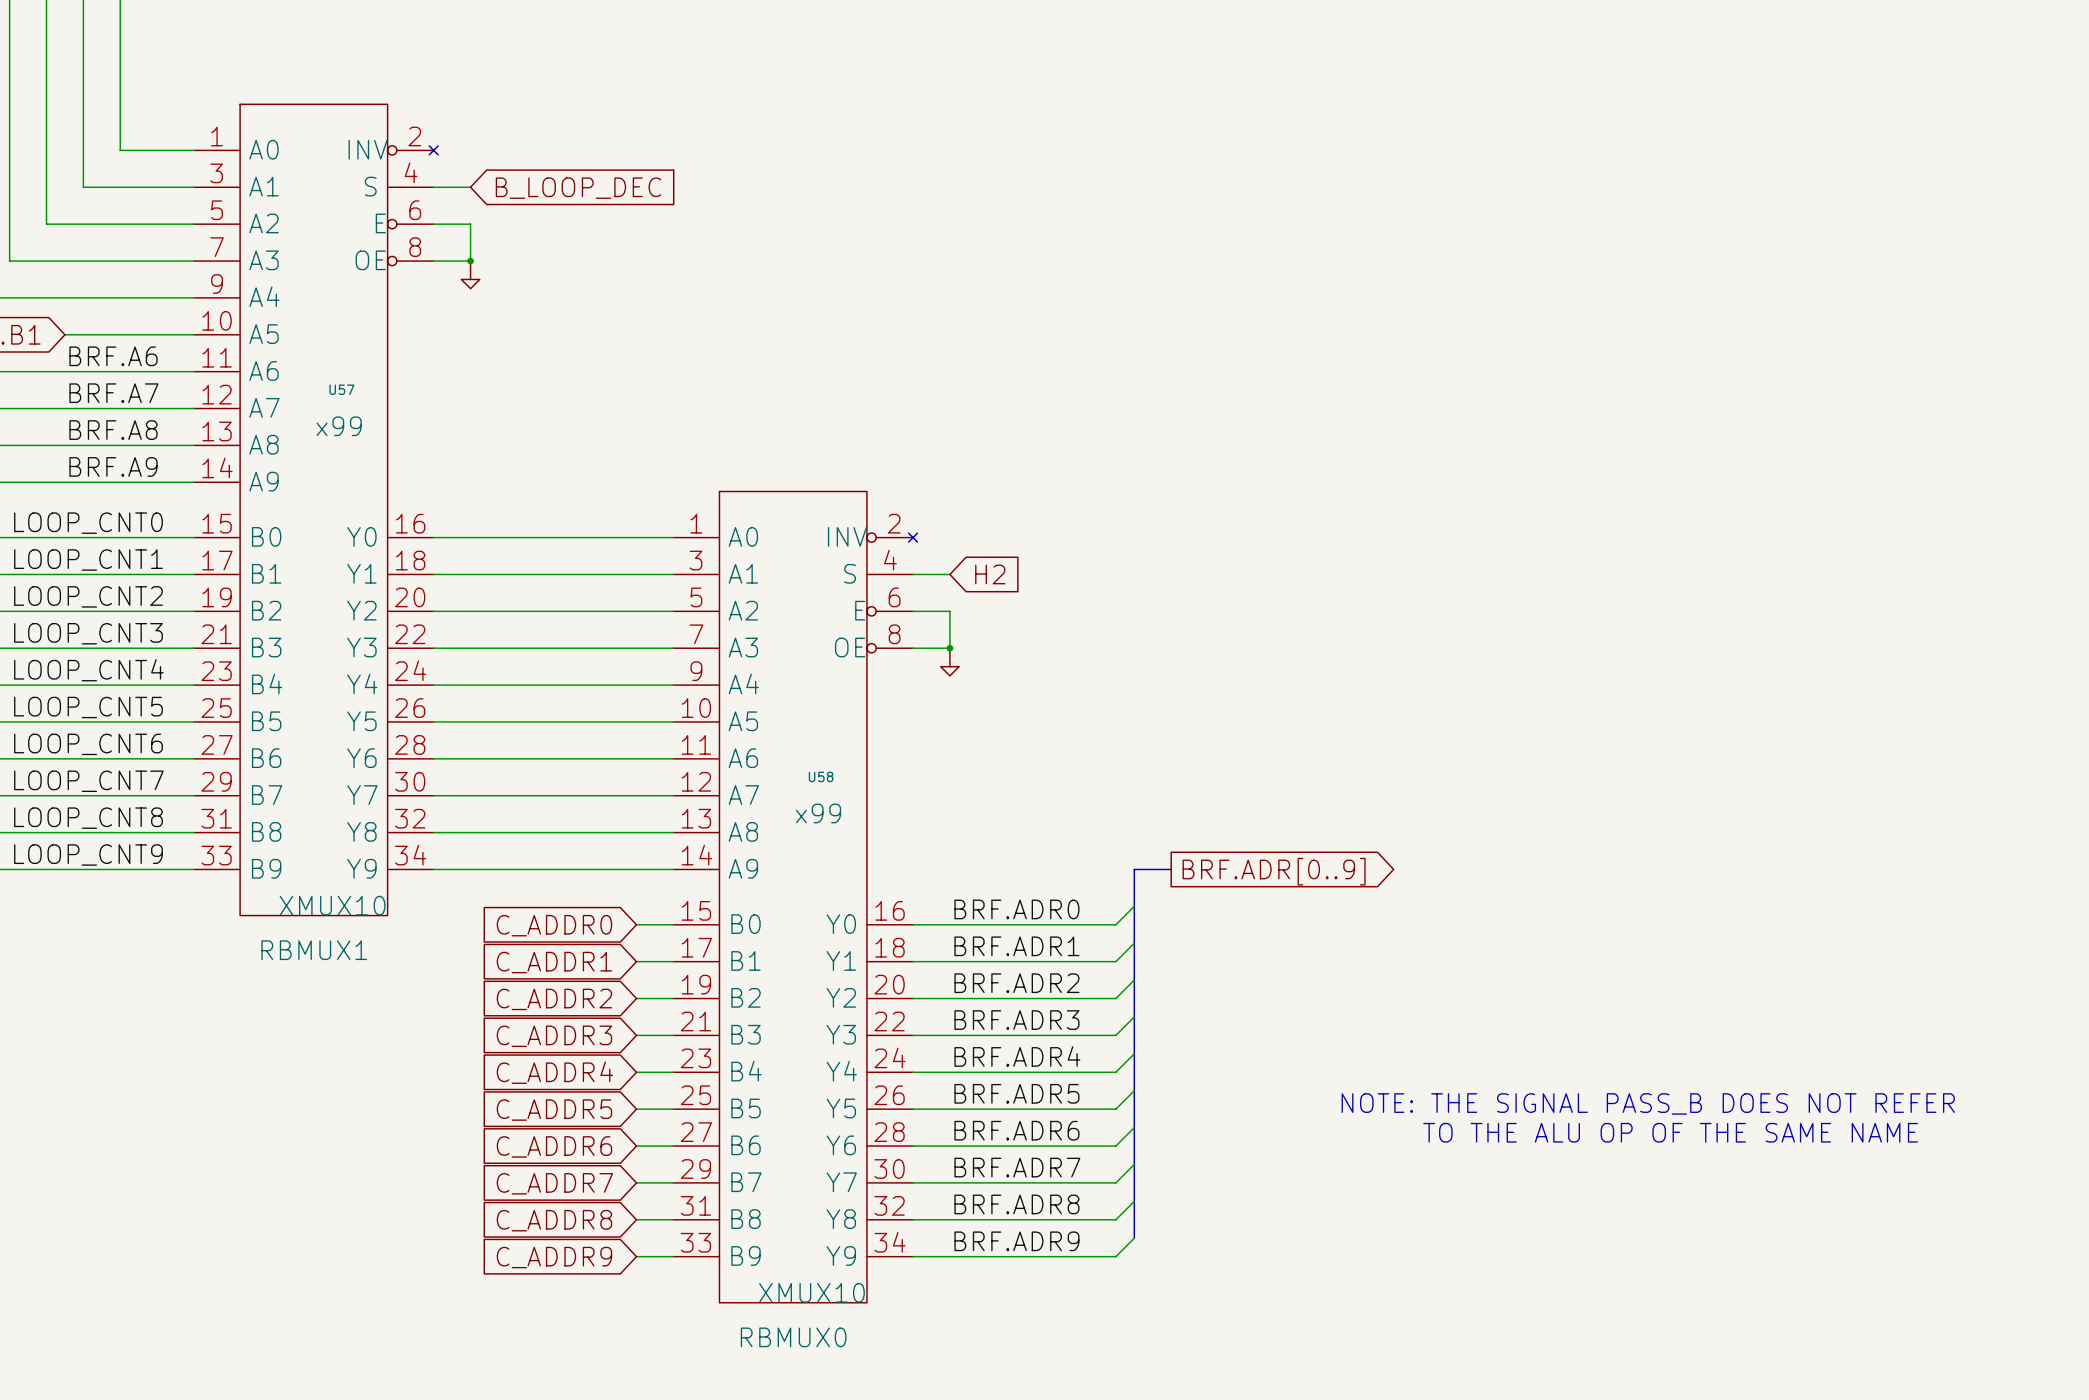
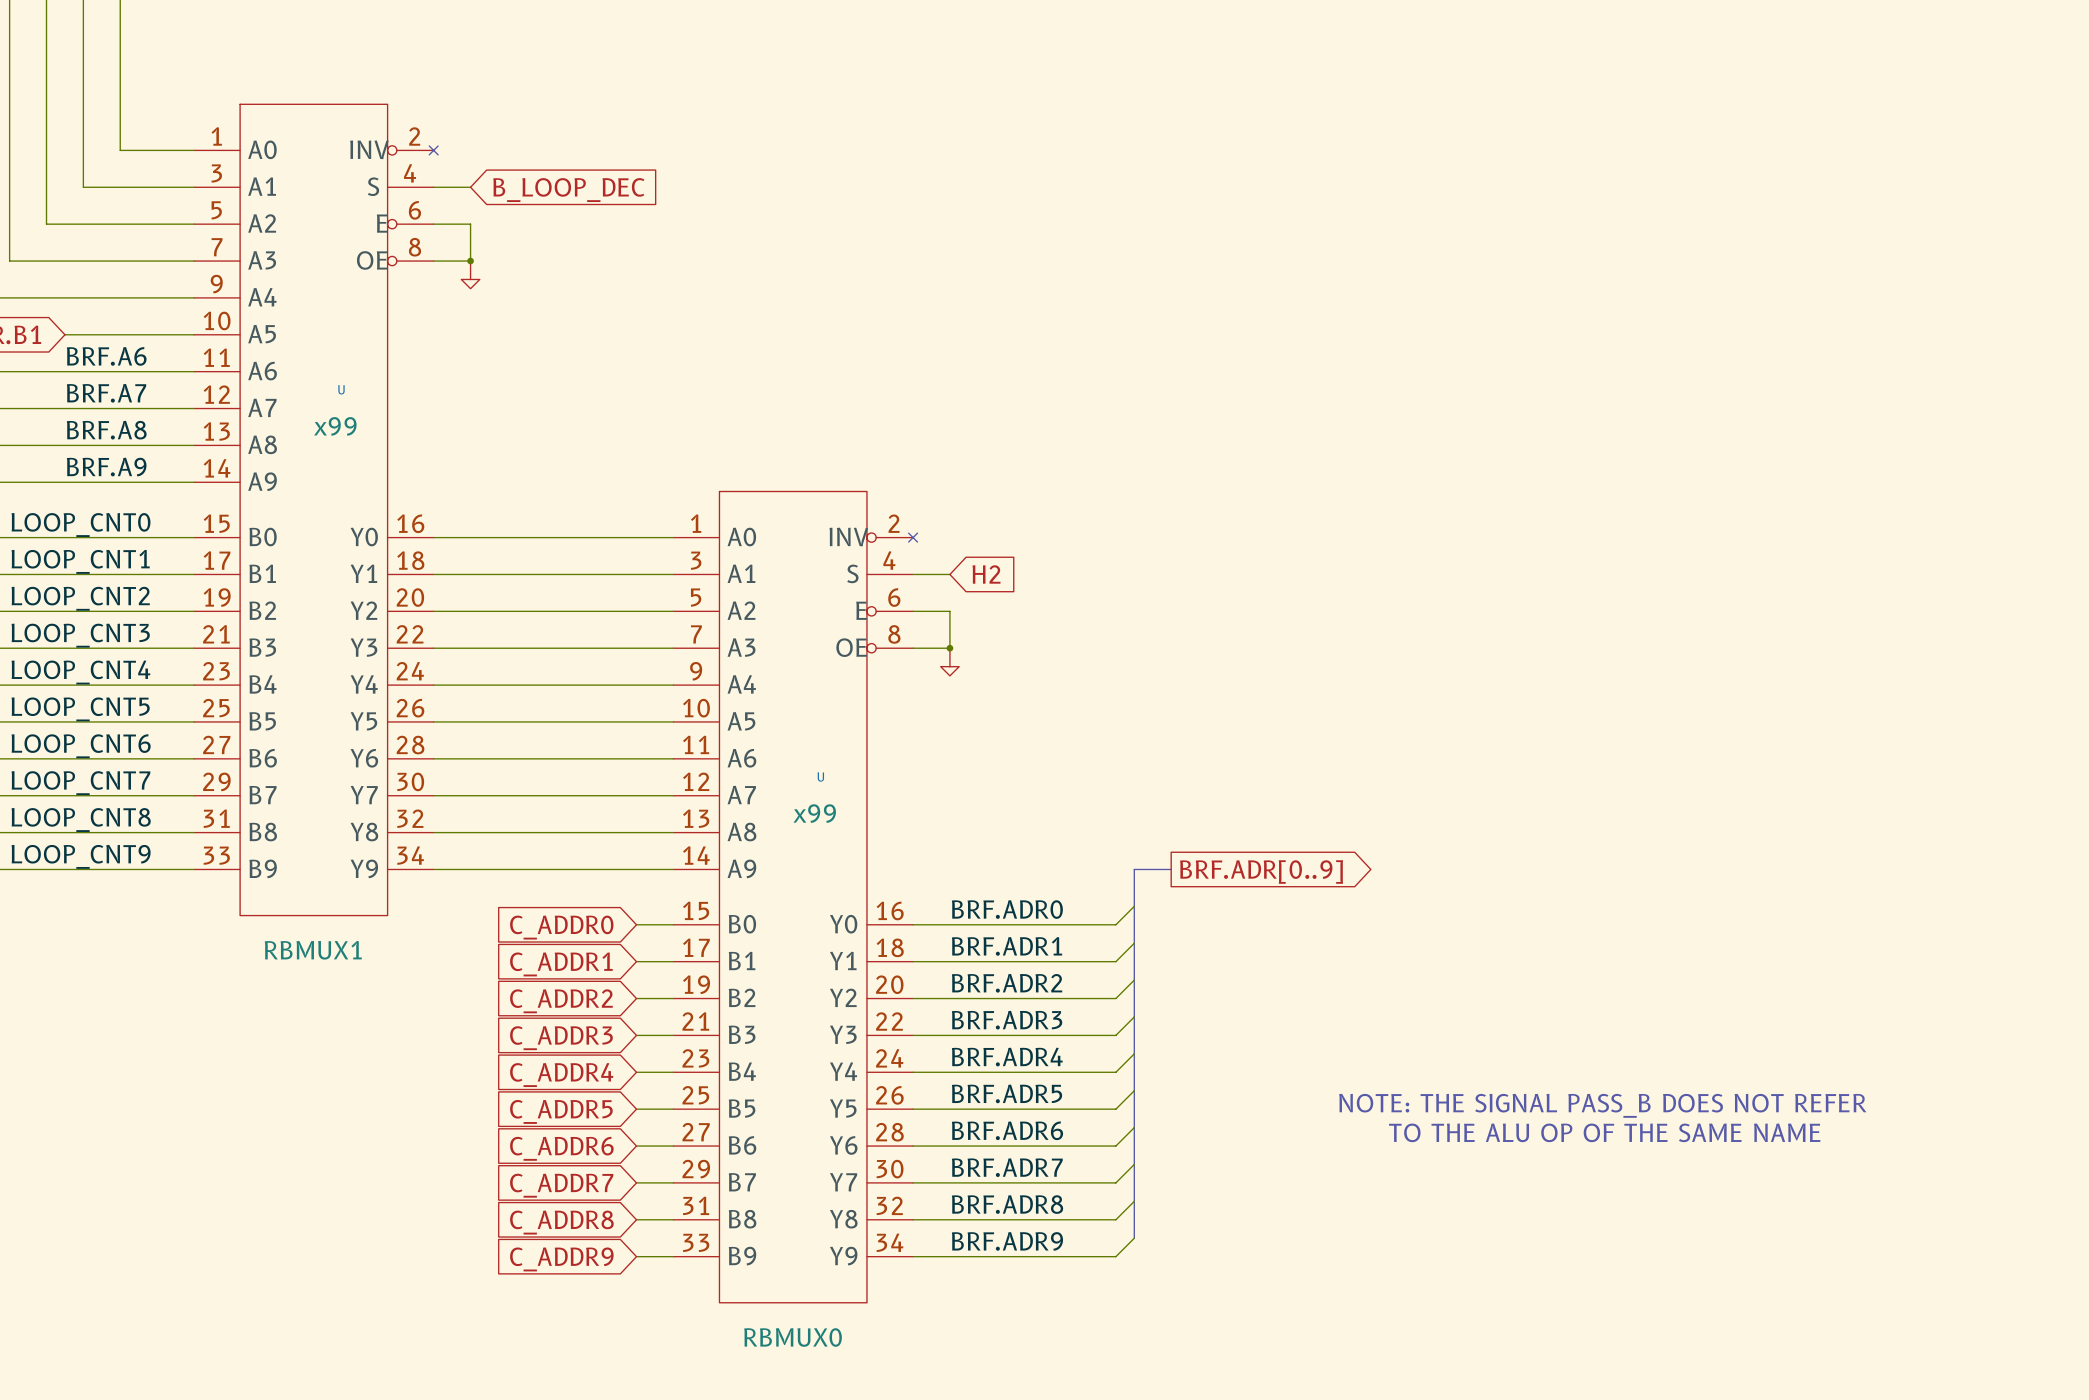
U57 name: U57 (341, 389) -> U (341, 389)
U58 name: U58 (821, 776) -> U (820, 776)
U57 value: XMUX10 (332, 905) -> none
U58 value: XMUX10 (811, 1292) -> none

